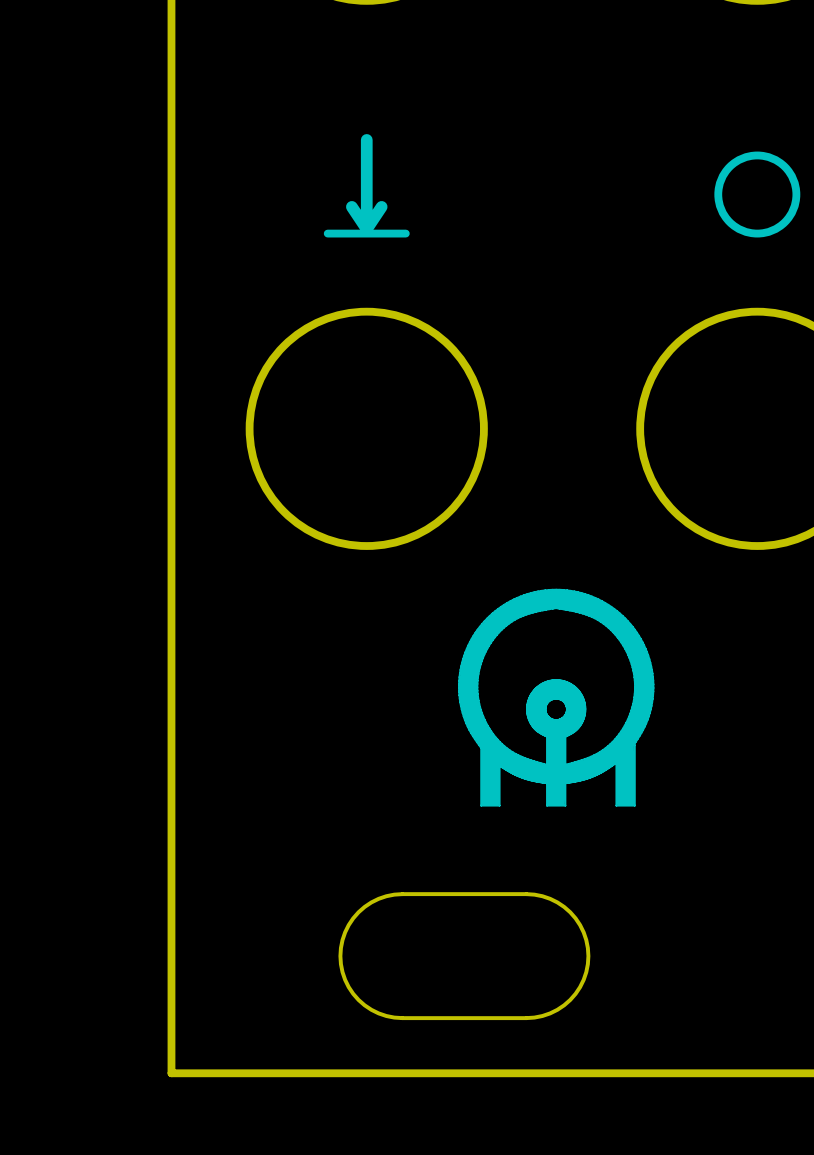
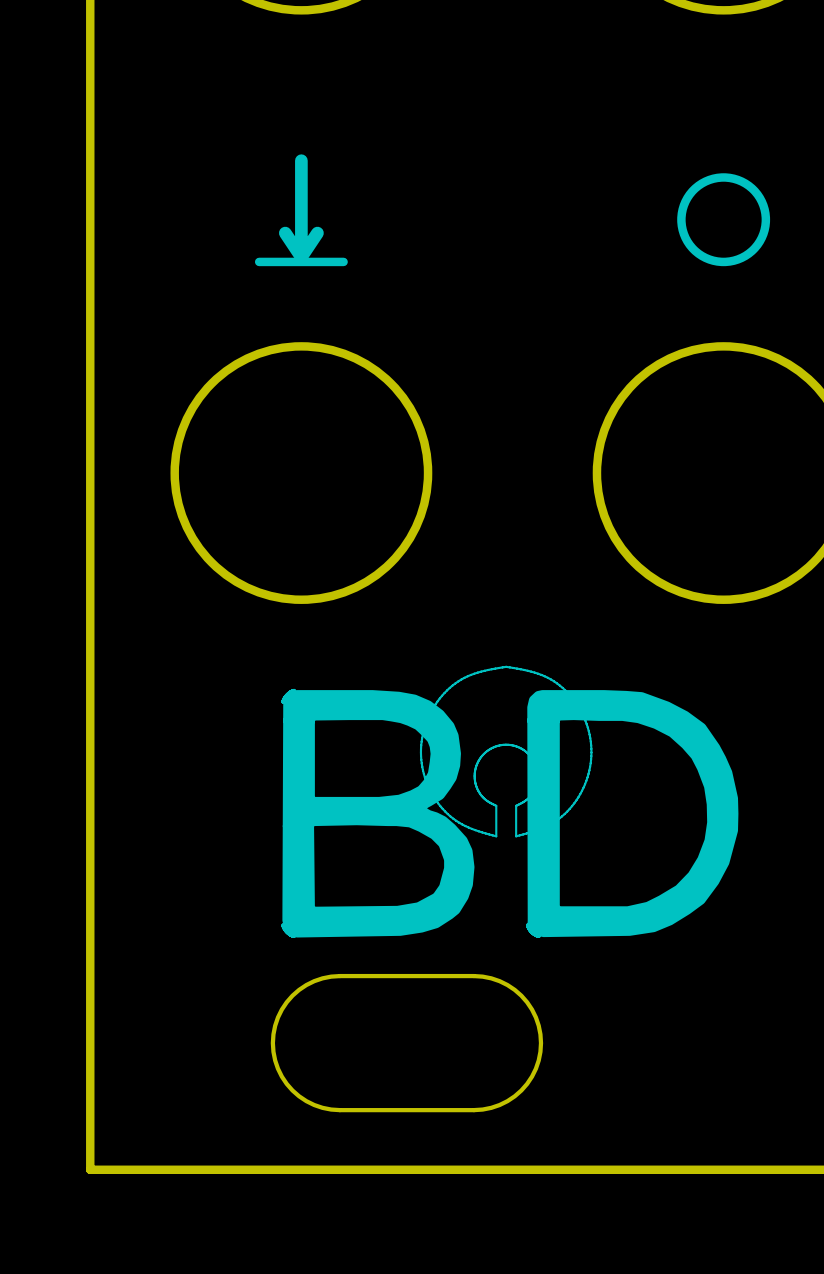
drawing: [458, 589, 654, 806] -> none
line: (552, 589) (581, 593) (611, 606) (632, 626) (647, 652) (652, 673) (653, 695) (647, 719) (633, 745) (634, 805) (616, 805) (616, 762) (592, 776) (565, 783) (565, 805) (547, 805) (547, 783) (521, 777) (499, 765) (499, 805) (481, 805) (481, 748) (466, 723) (459, 698) (459, 677) (464, 655) (477, 629) (498, 608) (523, 595) (552, 589) -> none
drawing: none -> [282, 690, 475, 938]
drawing: none -> [527, 690, 739, 938]

